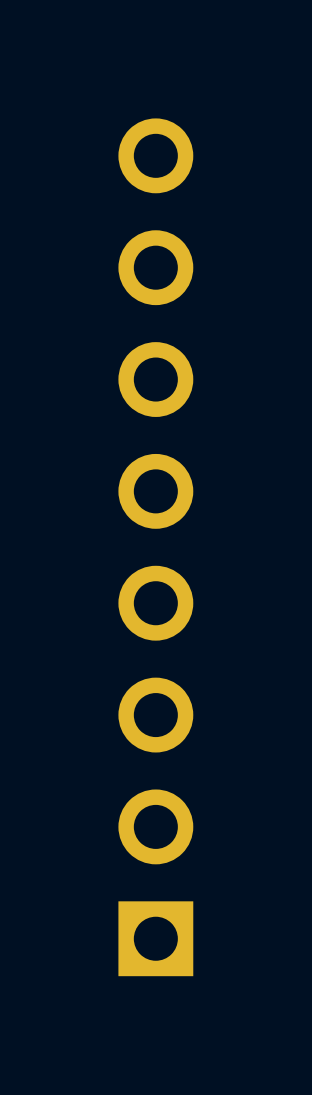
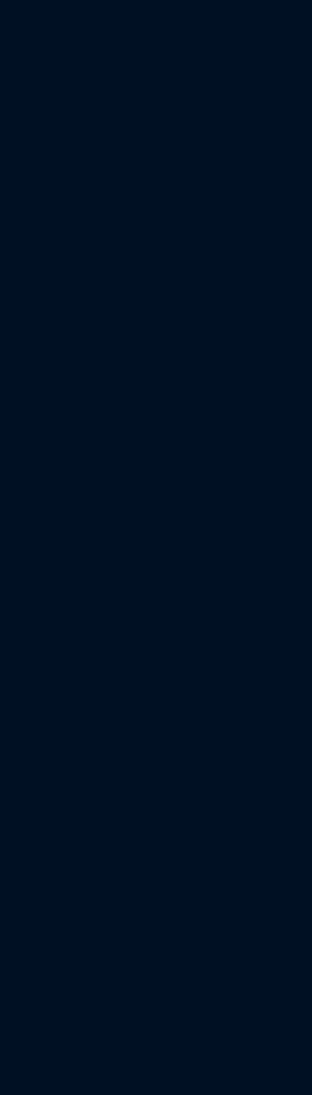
part: (155, 547) -> none

